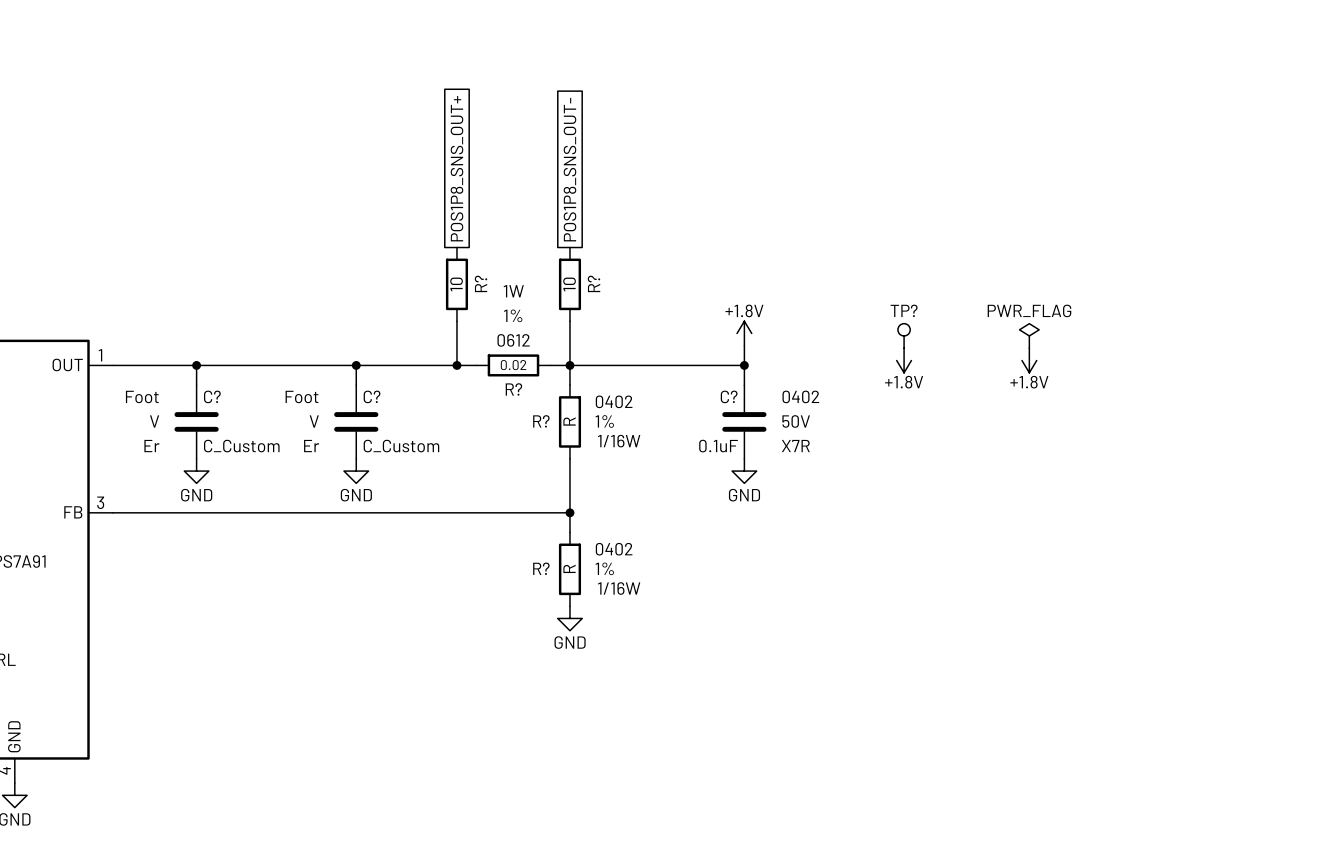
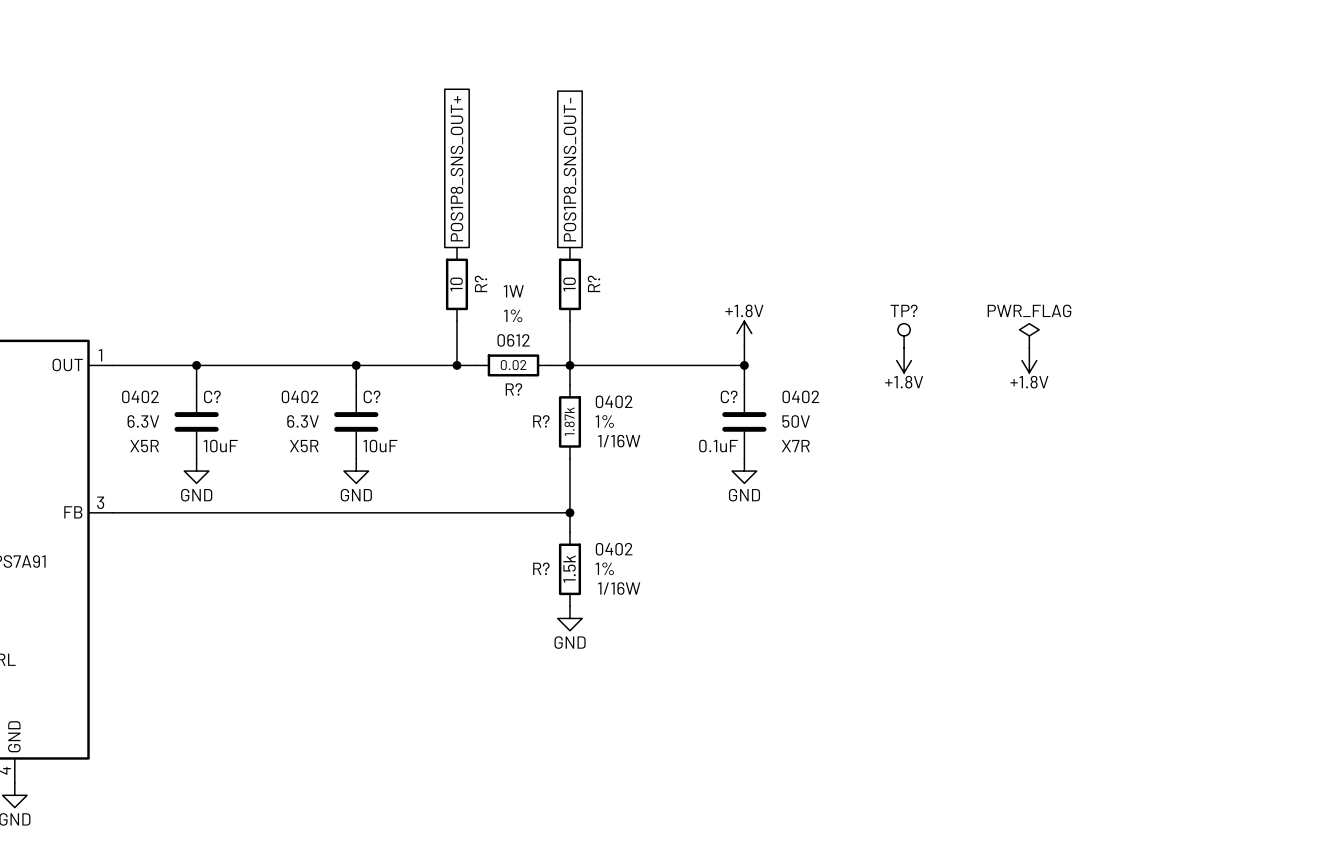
C? text: Foot (142, 396) -> 0402 (140, 396)
C? text: Foot (302, 396) -> 0402 (300, 396)
C? text: V (154, 421) -> 6.3V (143, 421)
C? text: V (314, 421) -> 6.3V (303, 421)
R? value: R (569, 421) -> 1.87k (569, 421)
C? text: Er (151, 446) -> X5R (144, 446)
C? value: C_Custom (241, 446) -> 10uF (220, 446)
C? text: Er (311, 446) -> X5R (304, 446)
C? value: C_Custom (401, 446) -> 10uF (380, 446)
R? value: R (569, 568) -> 1.5k (569, 569)

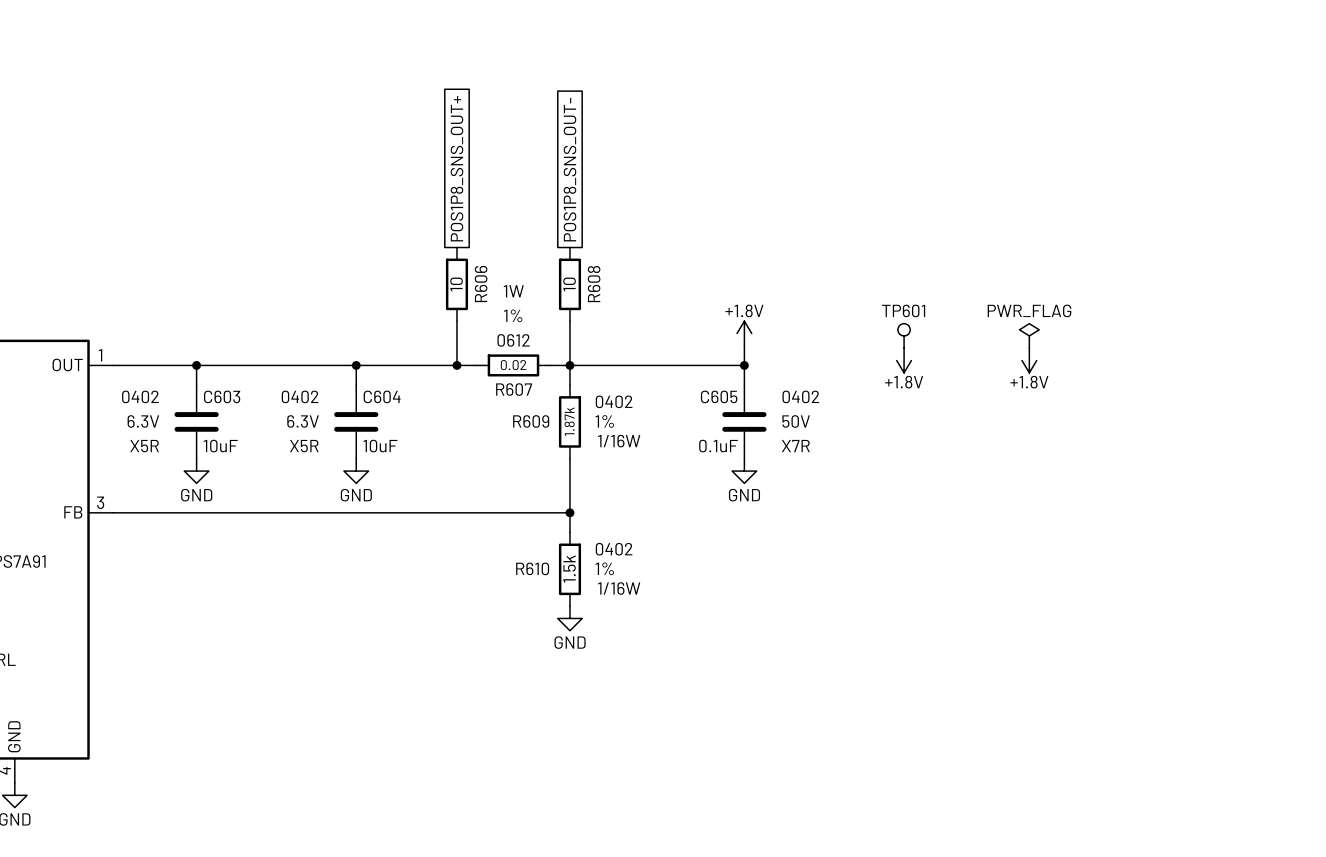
R? name: R? (481, 283) -> R606 (481, 283)
R? name: R? (594, 283) -> R608 (594, 284)
TP? name: TP? (904, 310) -> TP601 (903, 310)
R? name: R? (513, 389) -> R607 (514, 389)
C? name: C? (212, 396) -> C603 (222, 396)
C? name: C? (372, 396) -> C604 (382, 396)
C? name: C? (729, 396) -> C605 (719, 396)
R? name: R? (541, 421) -> R609 (531, 421)
R? name: R? (541, 568) -> R610 (532, 568)

